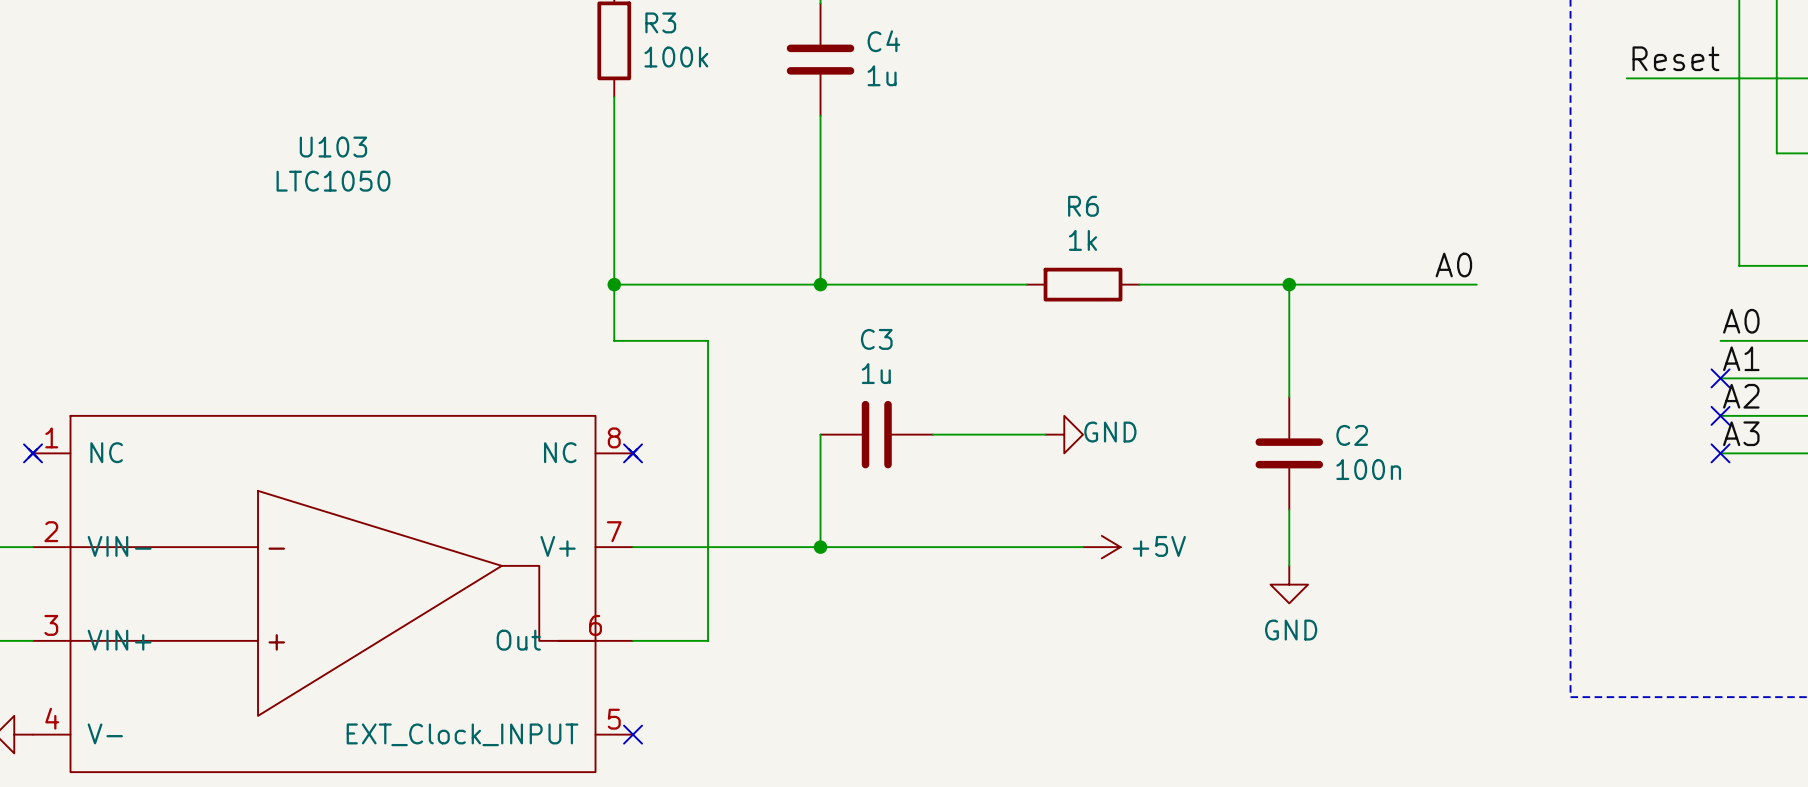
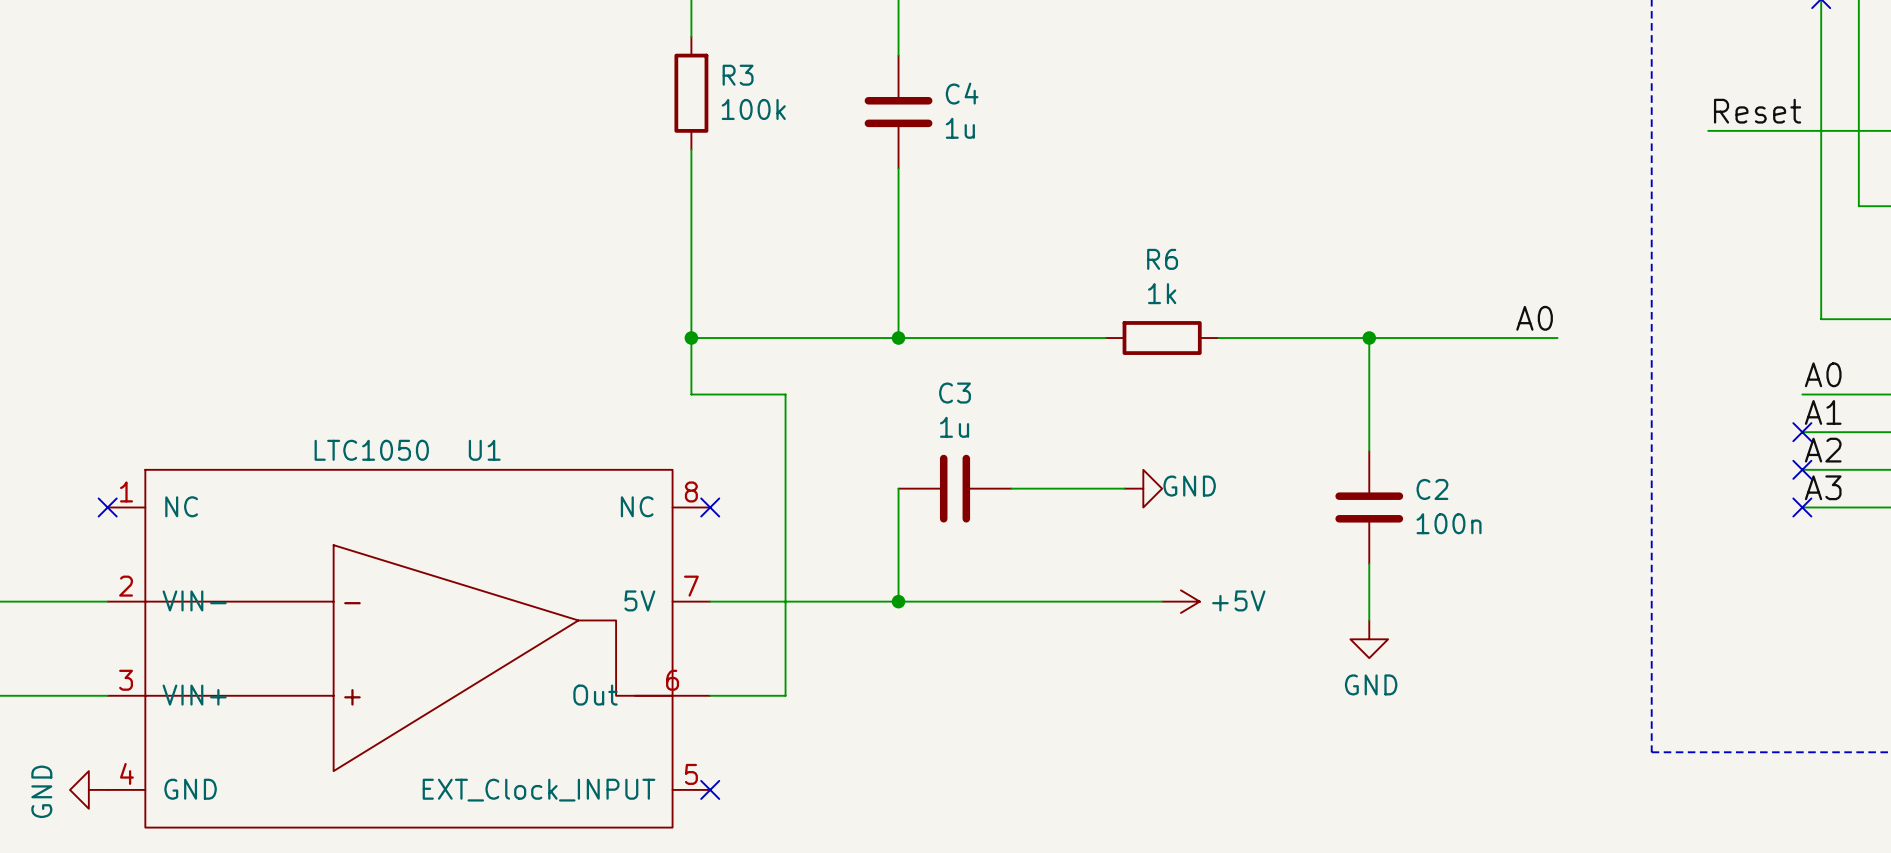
U103: LTC1050 (333, 490) -> none
U1: none -> LTC1050 (408, 545)

